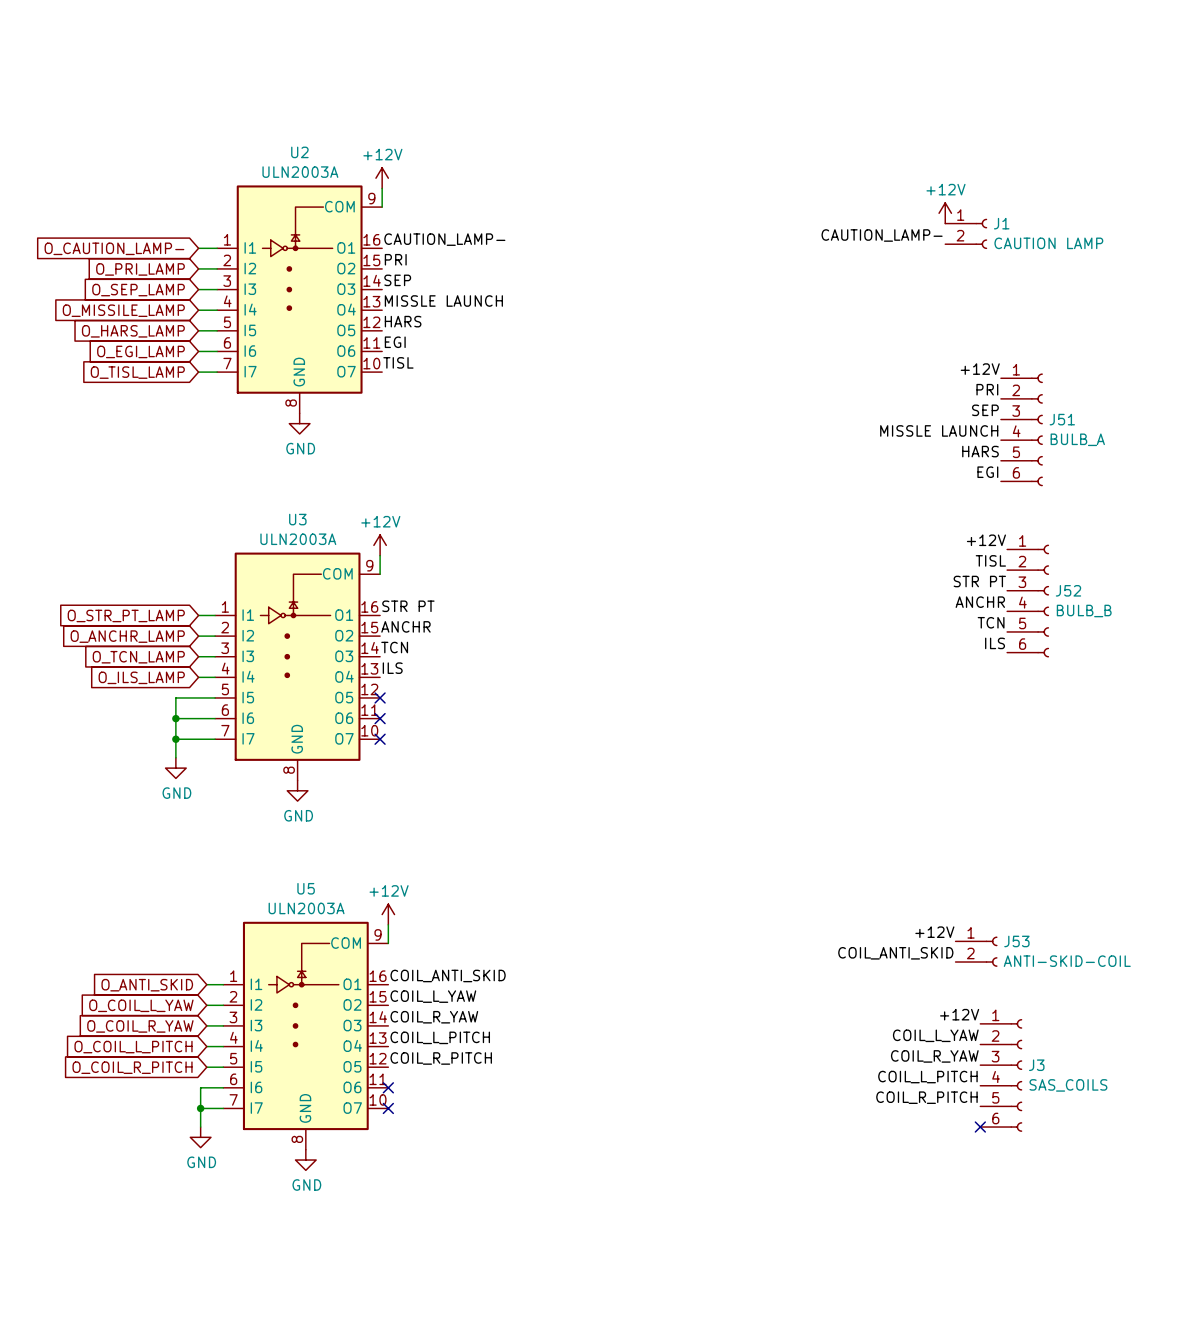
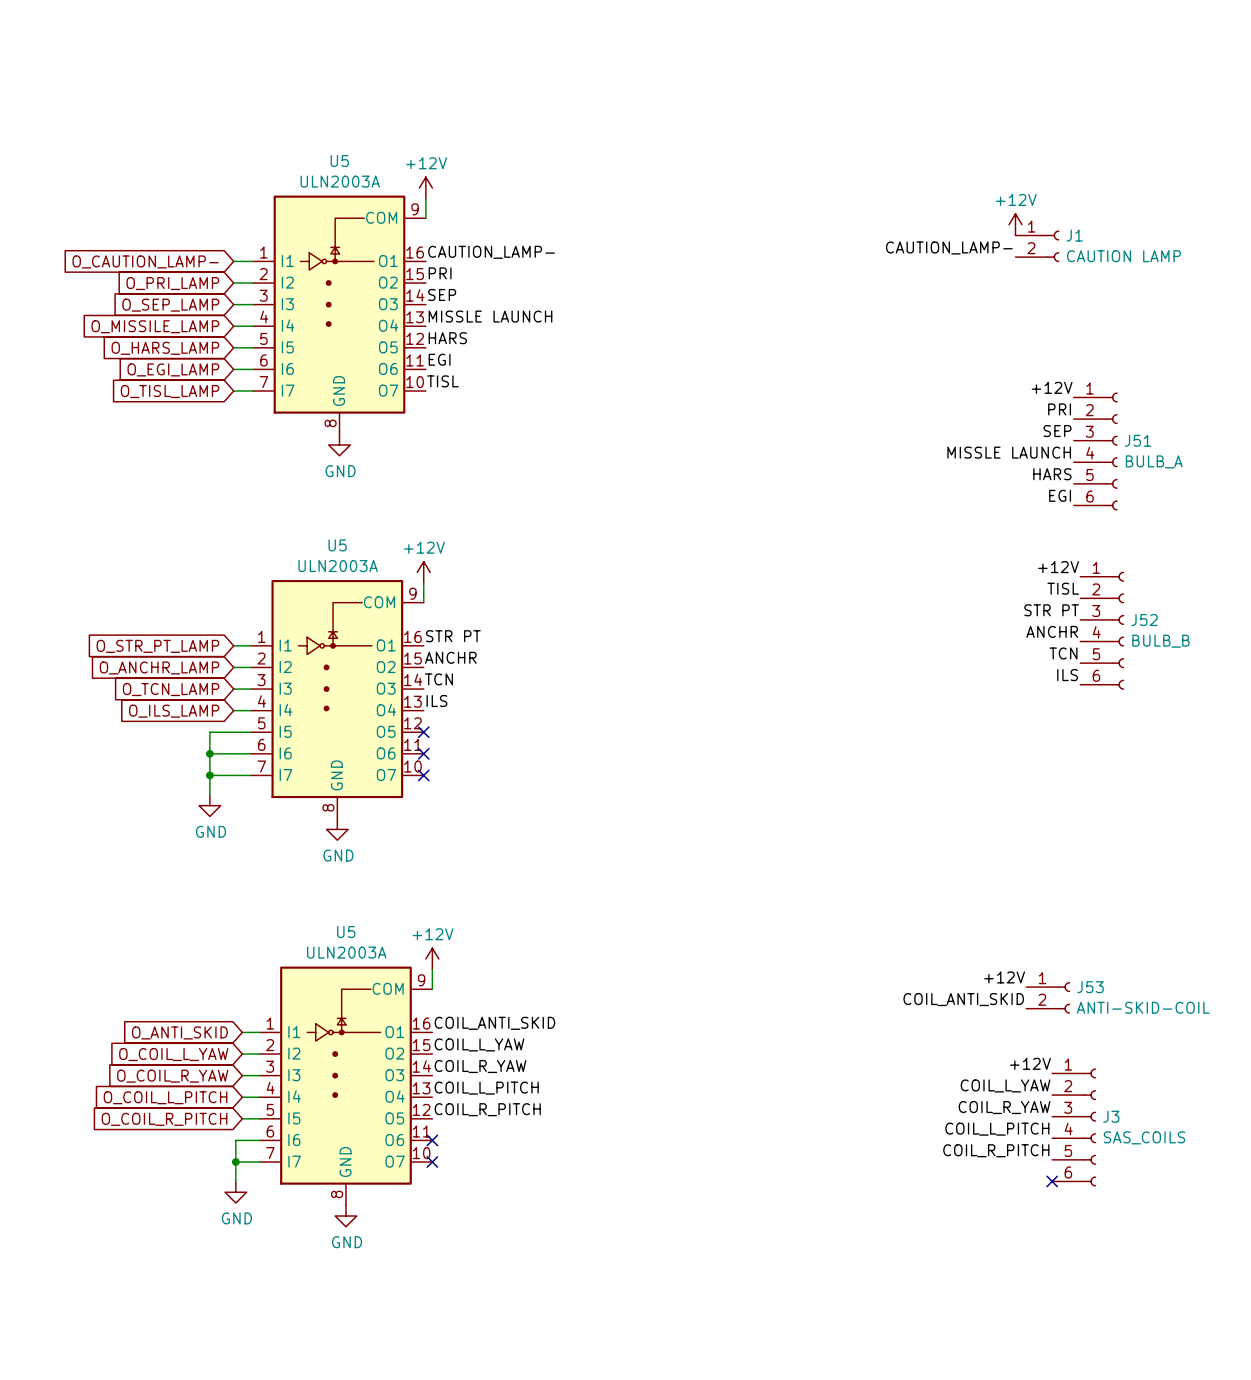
U2 name: U2 (299, 152) -> U5 (339, 160)
U3 name: U3 (297, 519) -> U5 (337, 545)

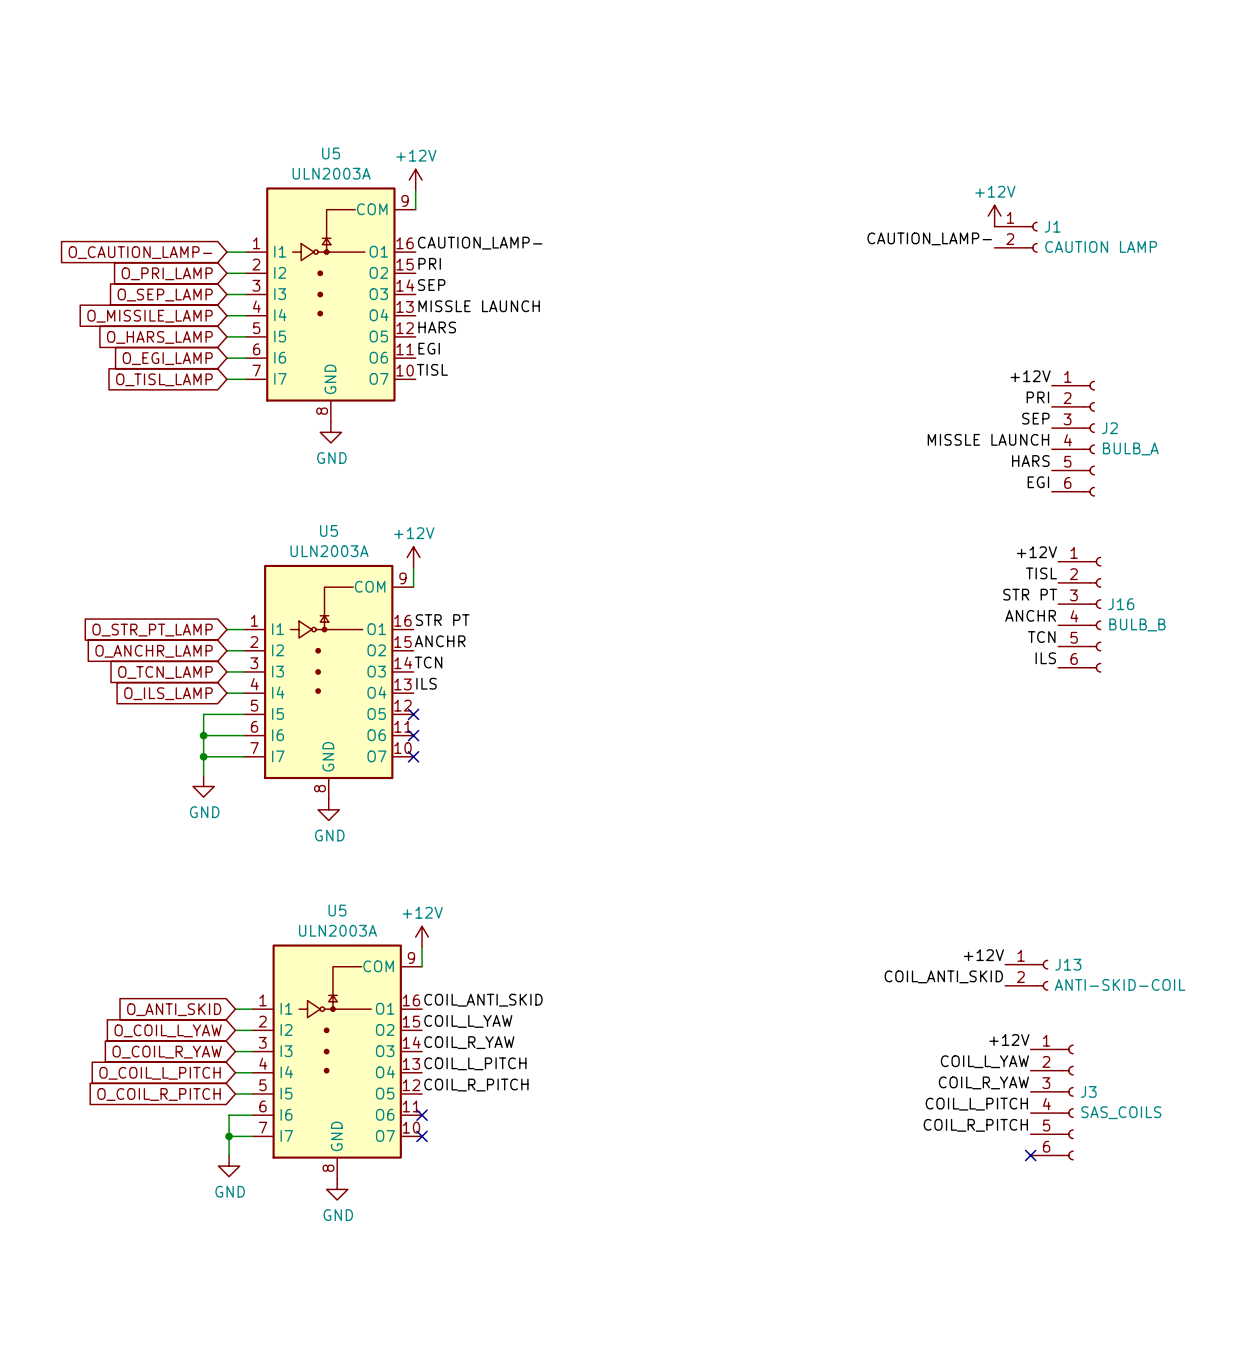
J51 name: J51 (1138, 440) -> J2 (1109, 428)
J52 name: J52 (1144, 620) -> J16 (1121, 604)
J53 name: J53 (1090, 987) -> J13 (1068, 964)

